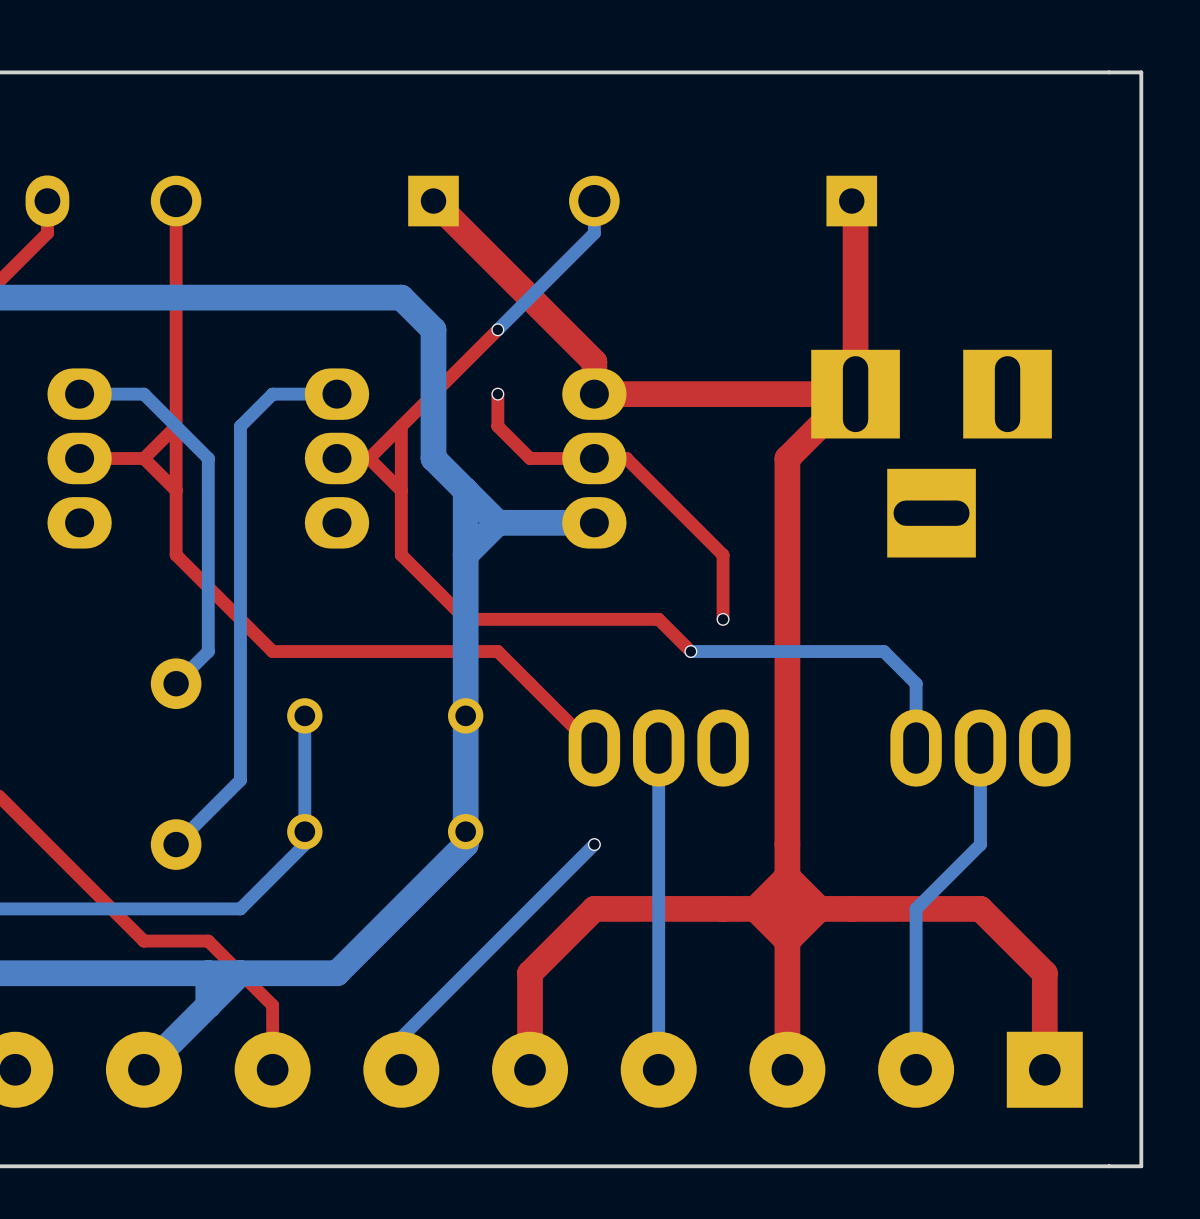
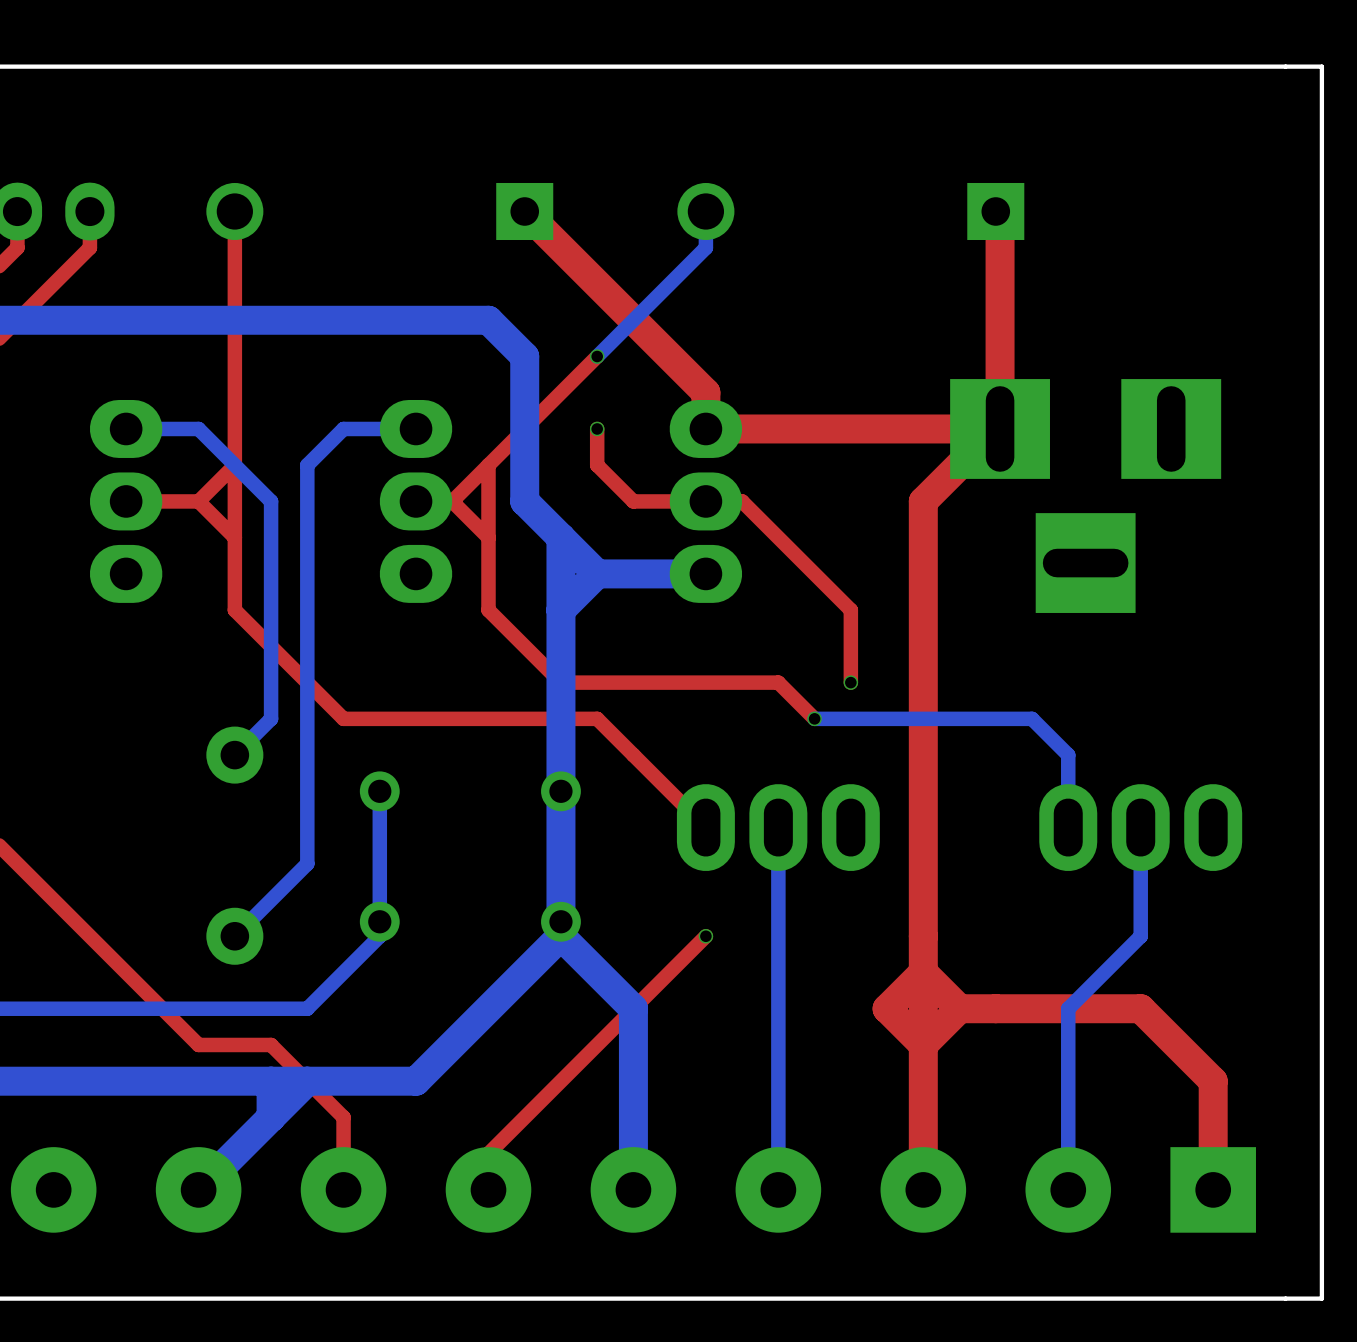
bottom track: none -> (560, 936) (633, 1008) (633, 1189)
top track: none -> (705, 936) (488, 1153) (488, 1189)
bottom track: (594, 844) (401, 1037) (401, 1069) -> none
top track: (819, 908) (594, 908) (530, 973) (530, 1069) -> none

